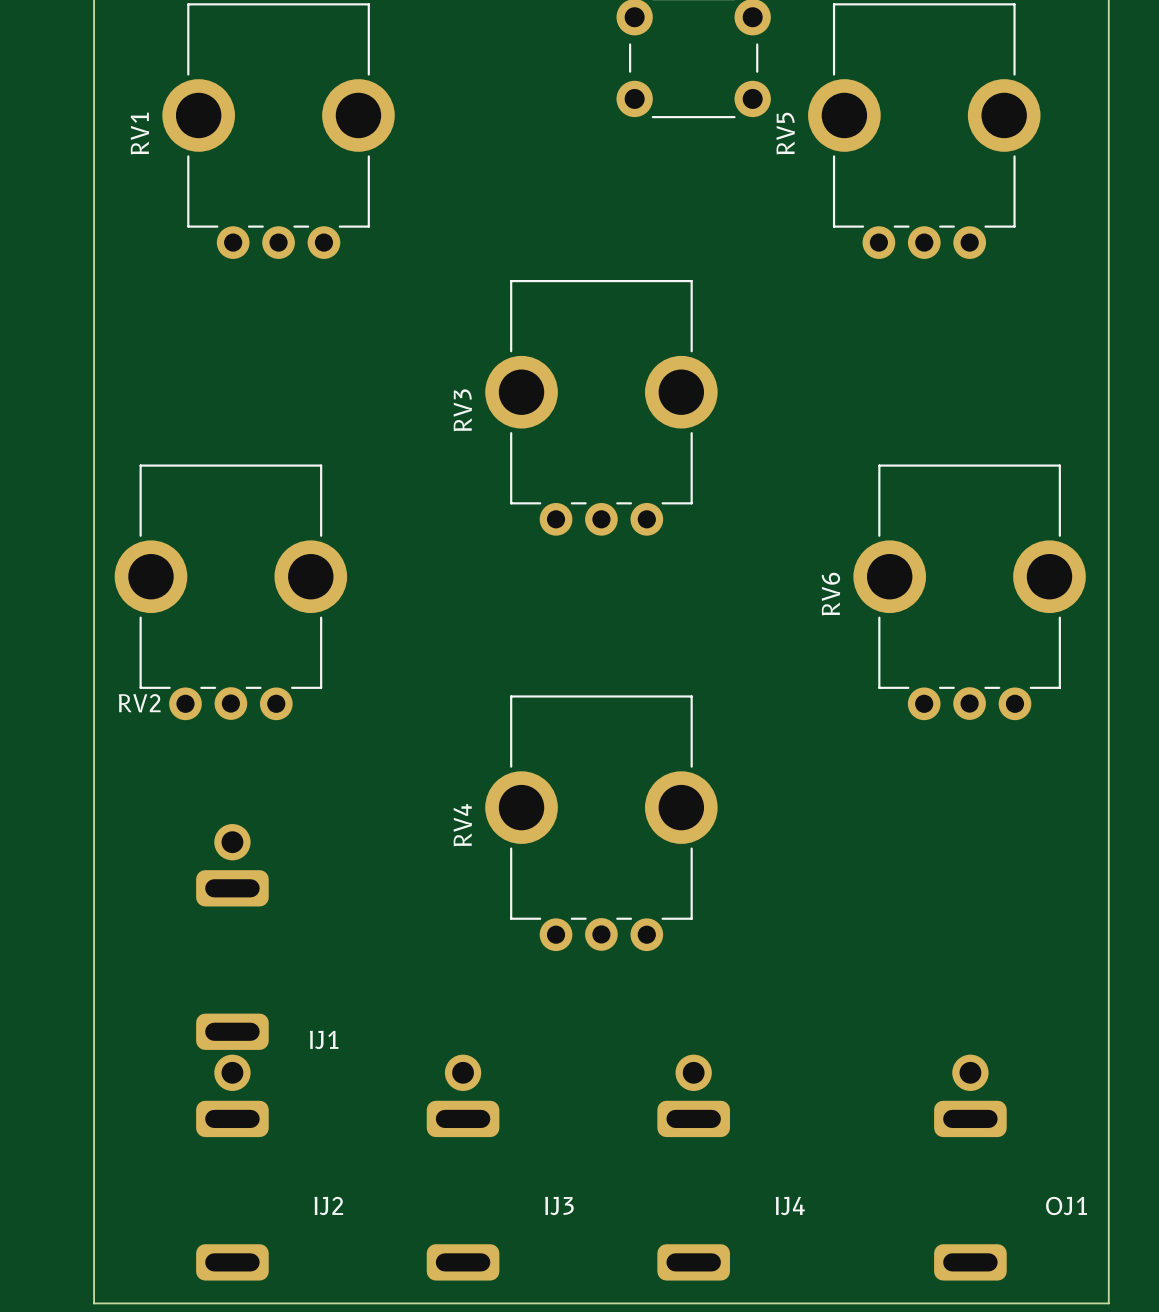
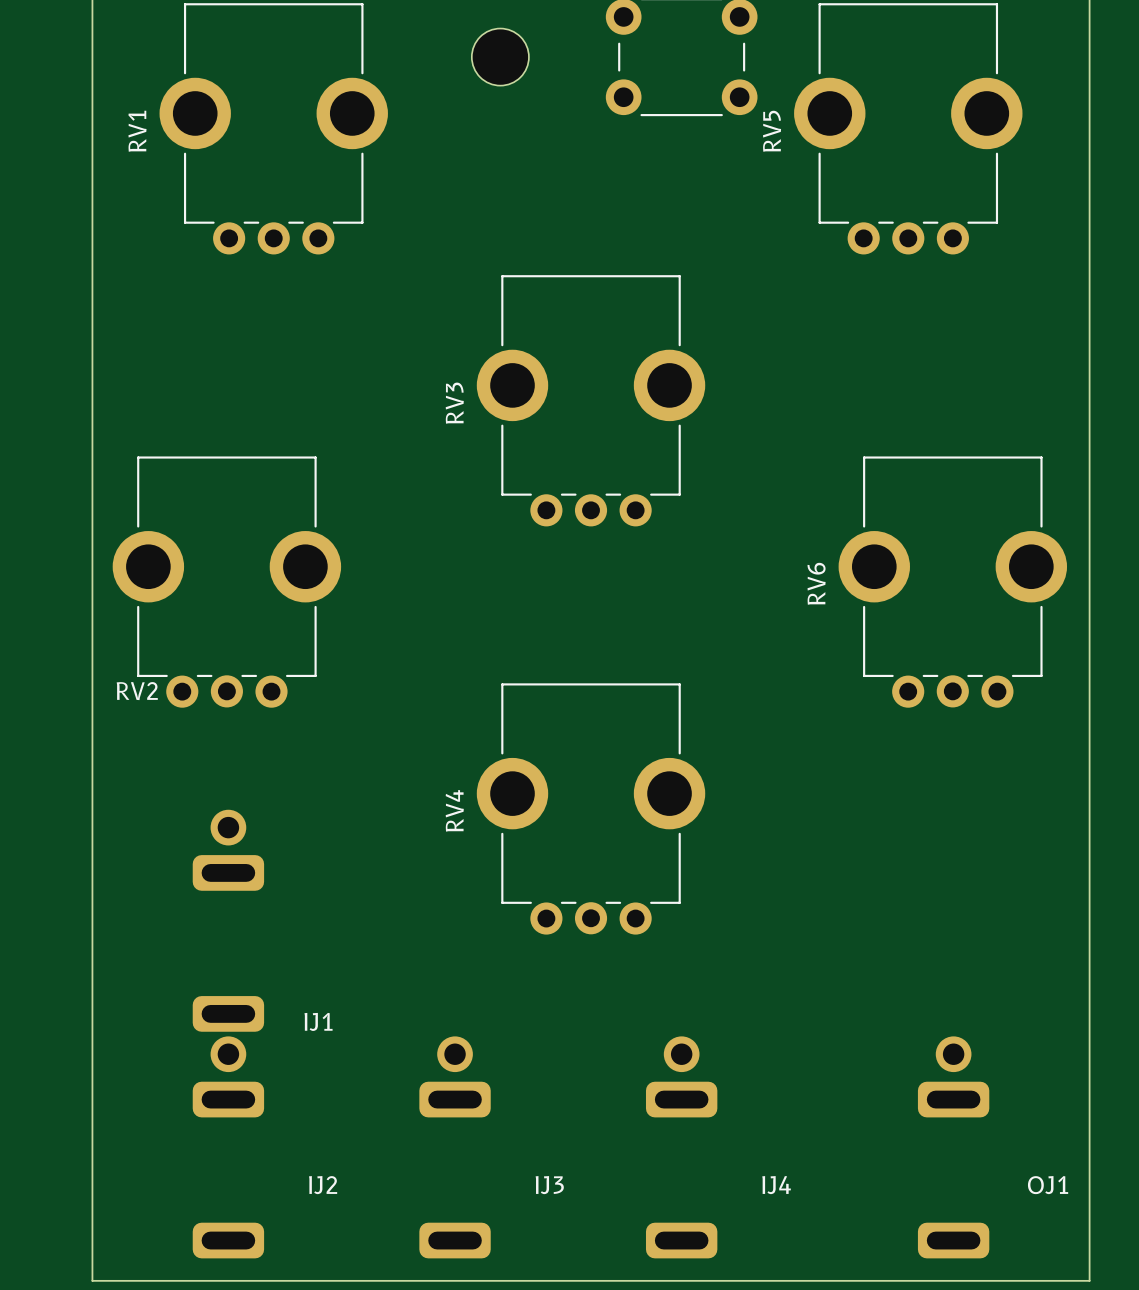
part: none -> (500, 57)

